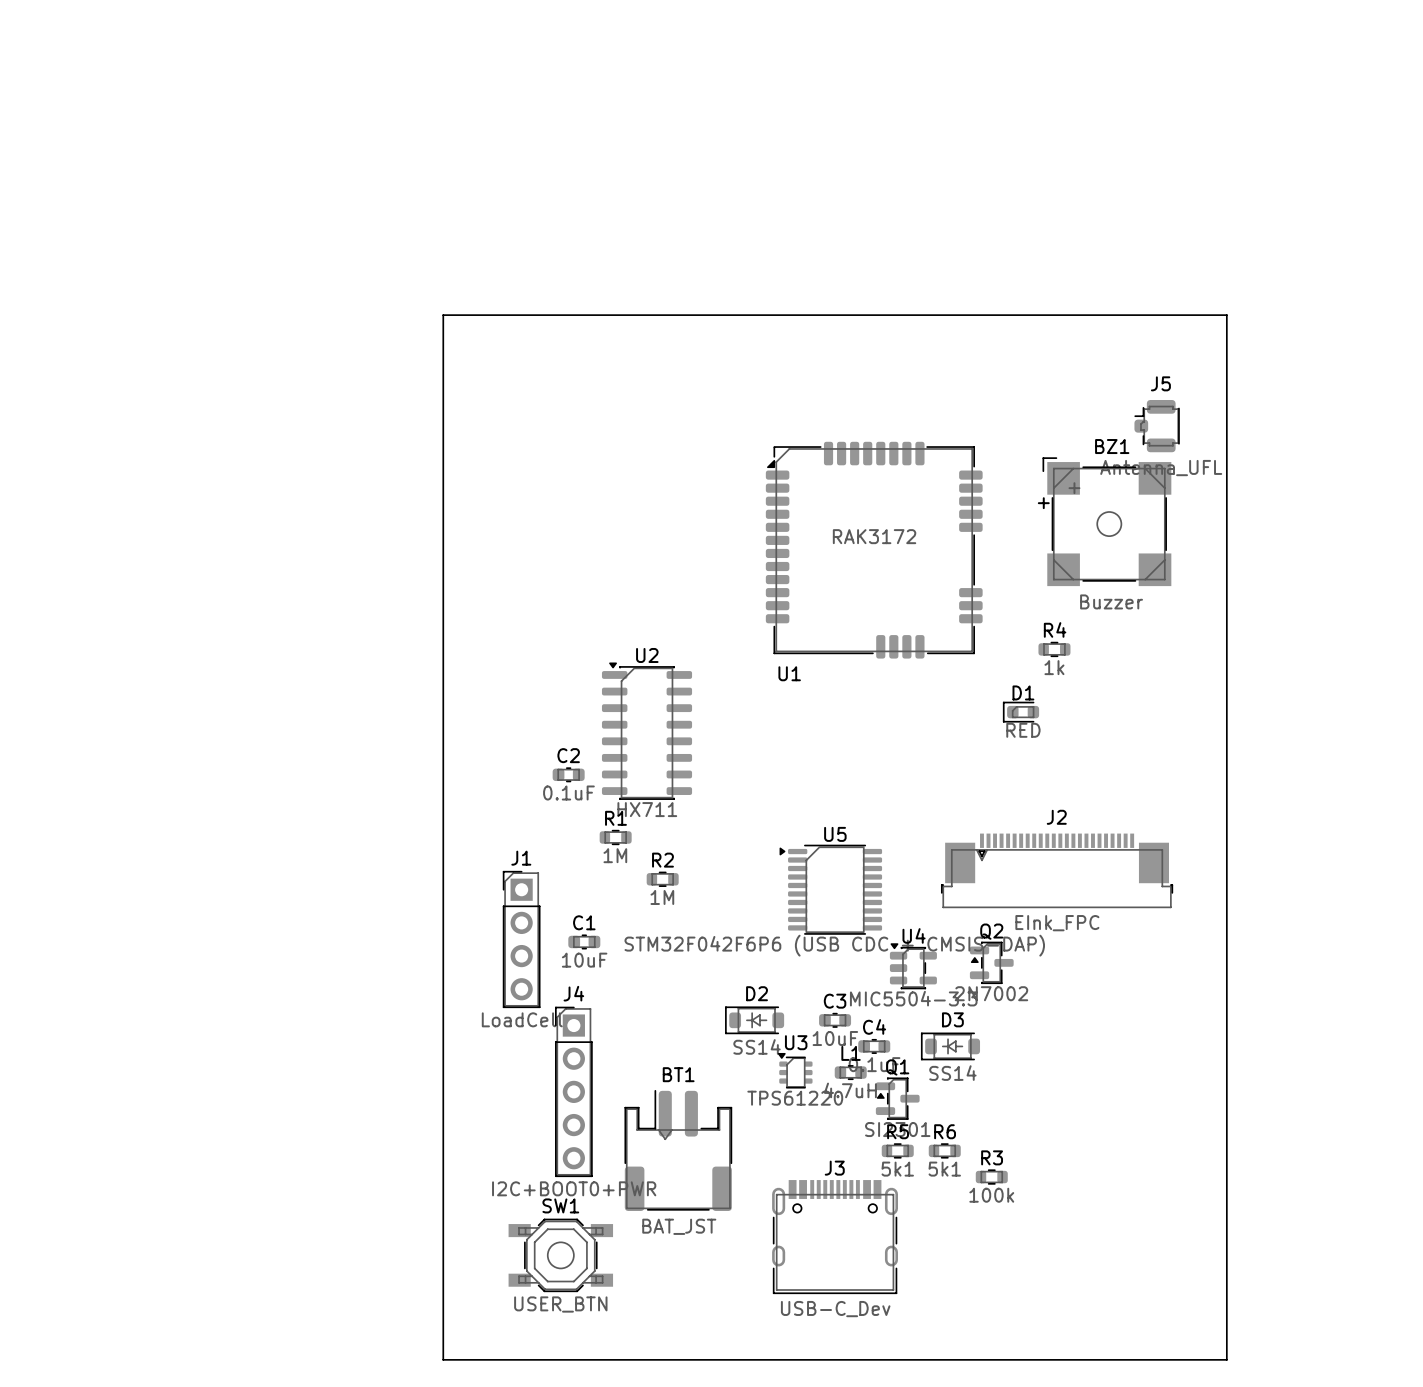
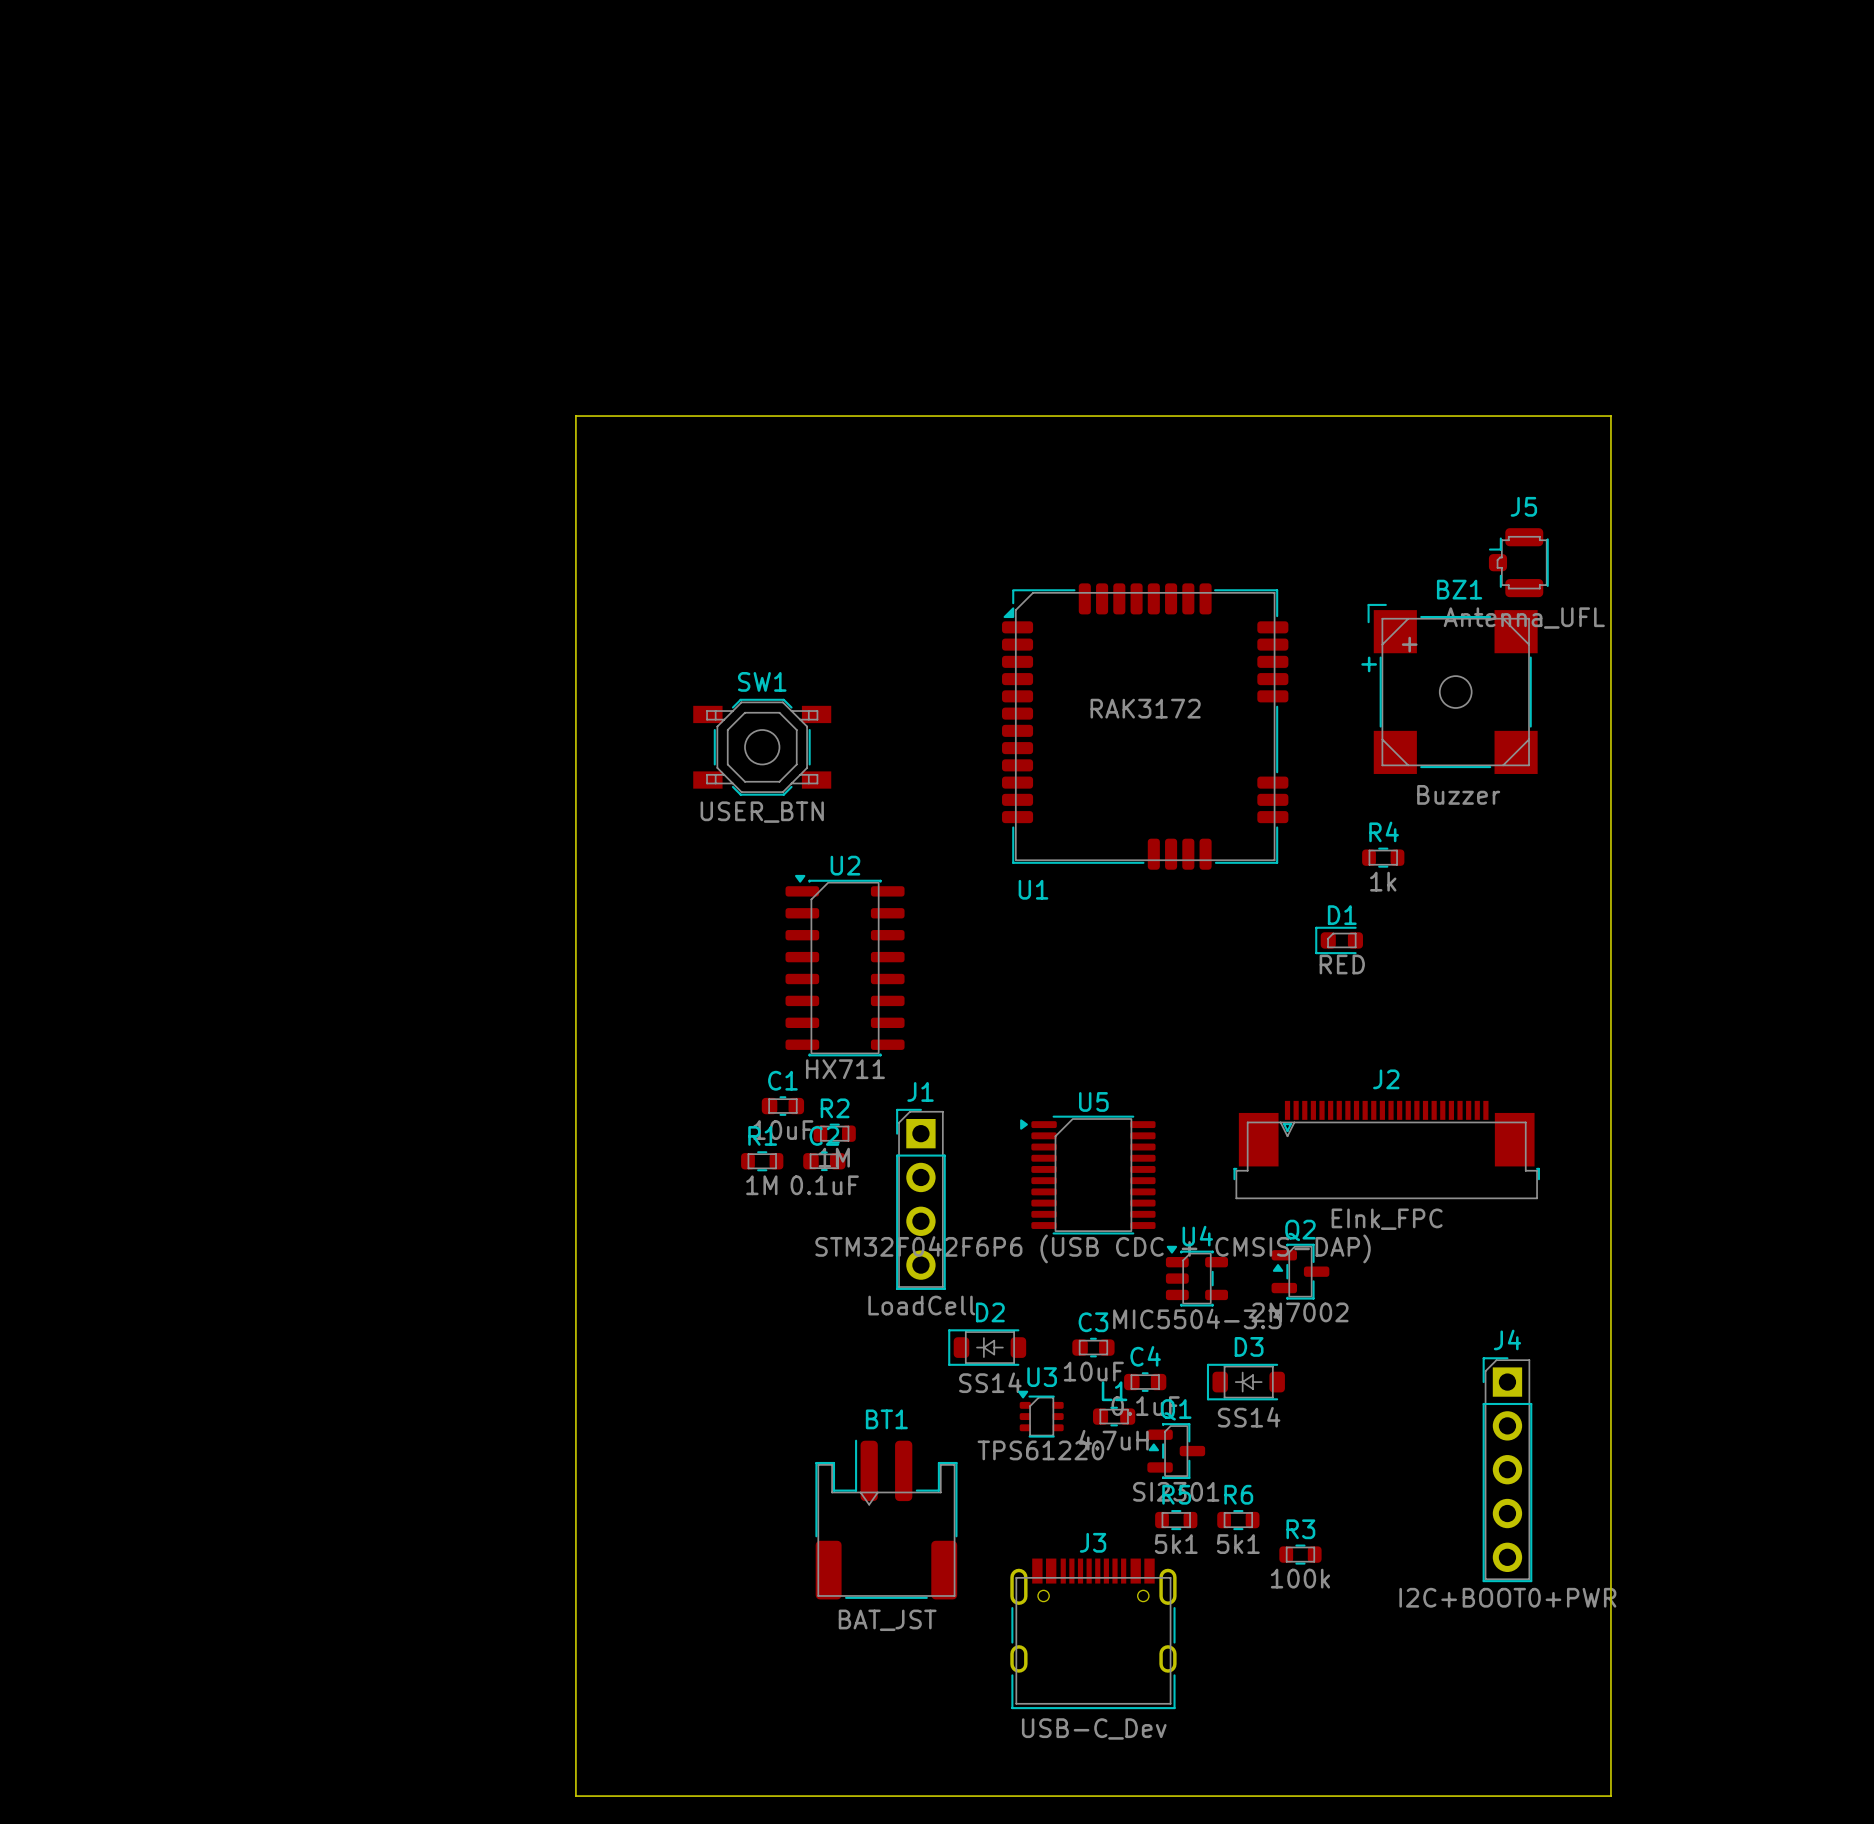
C2 position: (568, 774) -> (824, 1161)
R1 position: (615, 837) -> (762, 1161)
R2 position: (662, 879) -> (834, 1133)
J1 position: (521, 939) -> (920, 1199)
C1 position: (584, 941) -> (782, 1106)
J4 position: (573, 1091) -> (1507, 1469)
SW1 position: (560, 1255) -> (762, 747)

